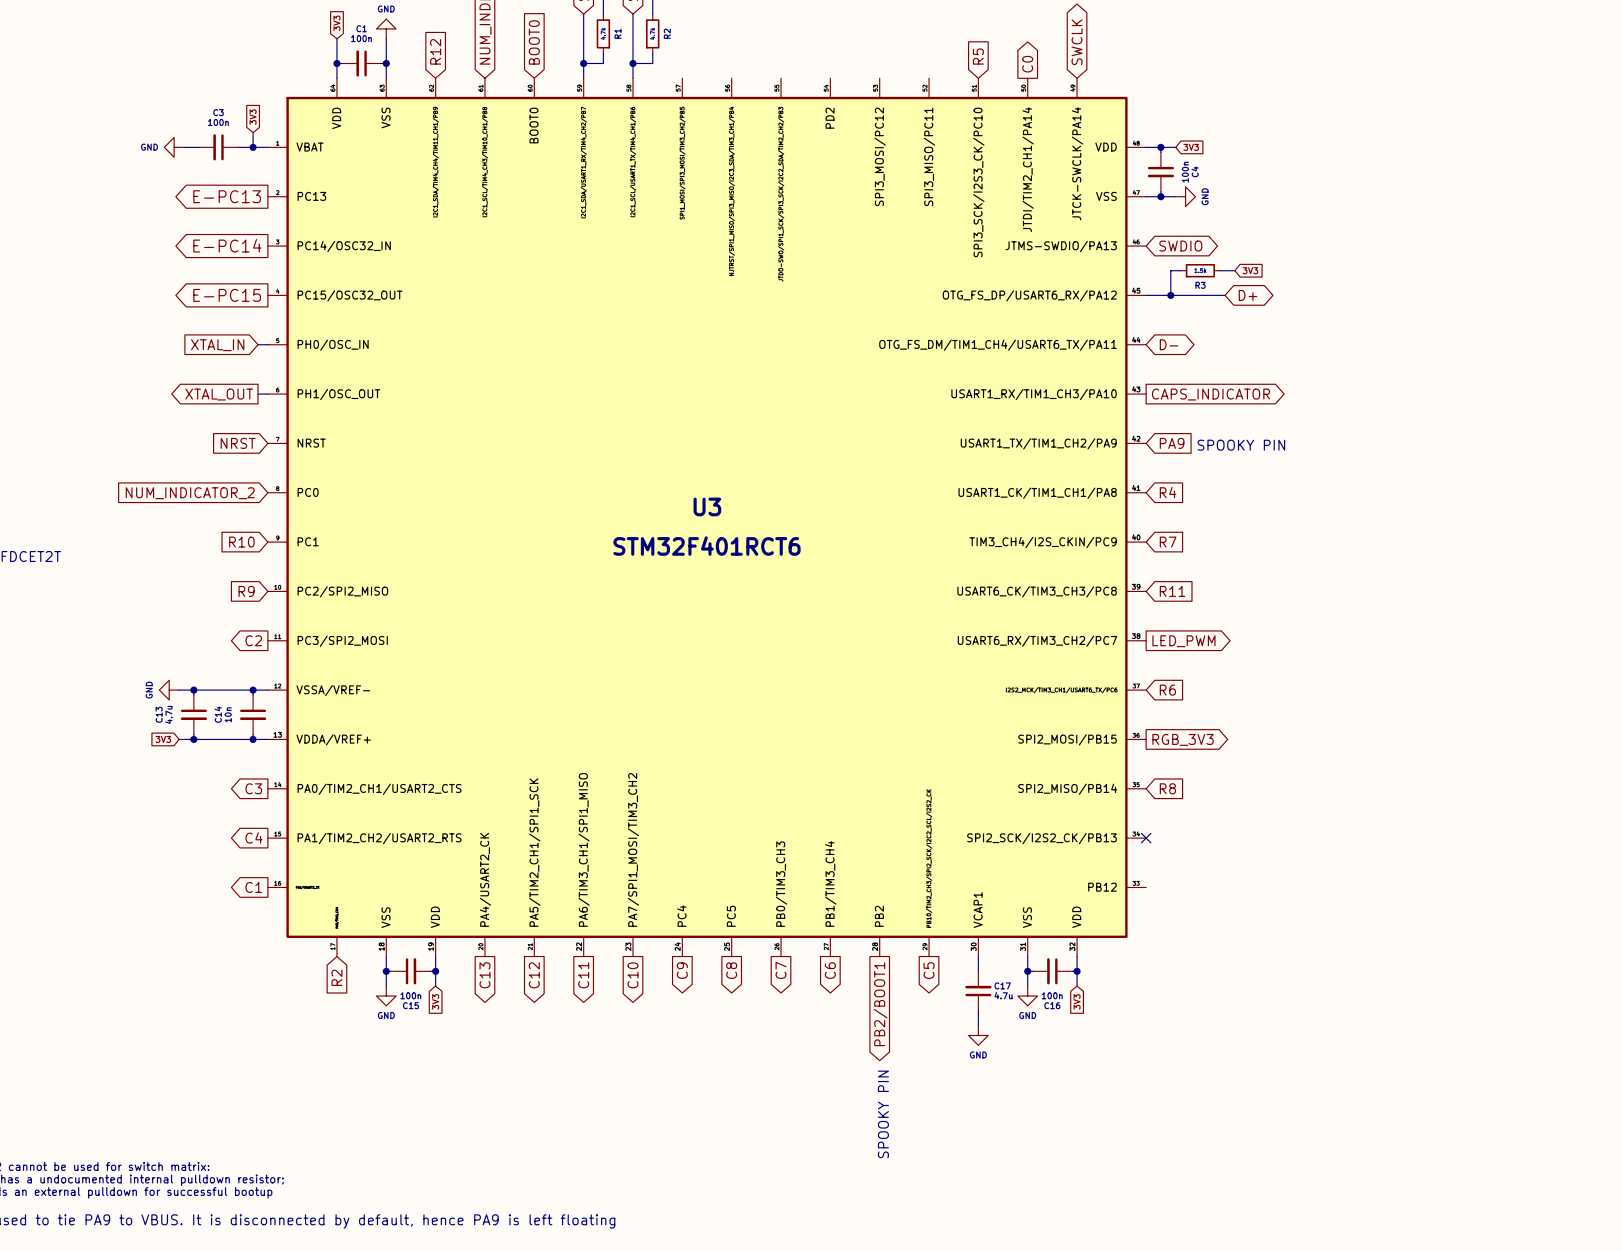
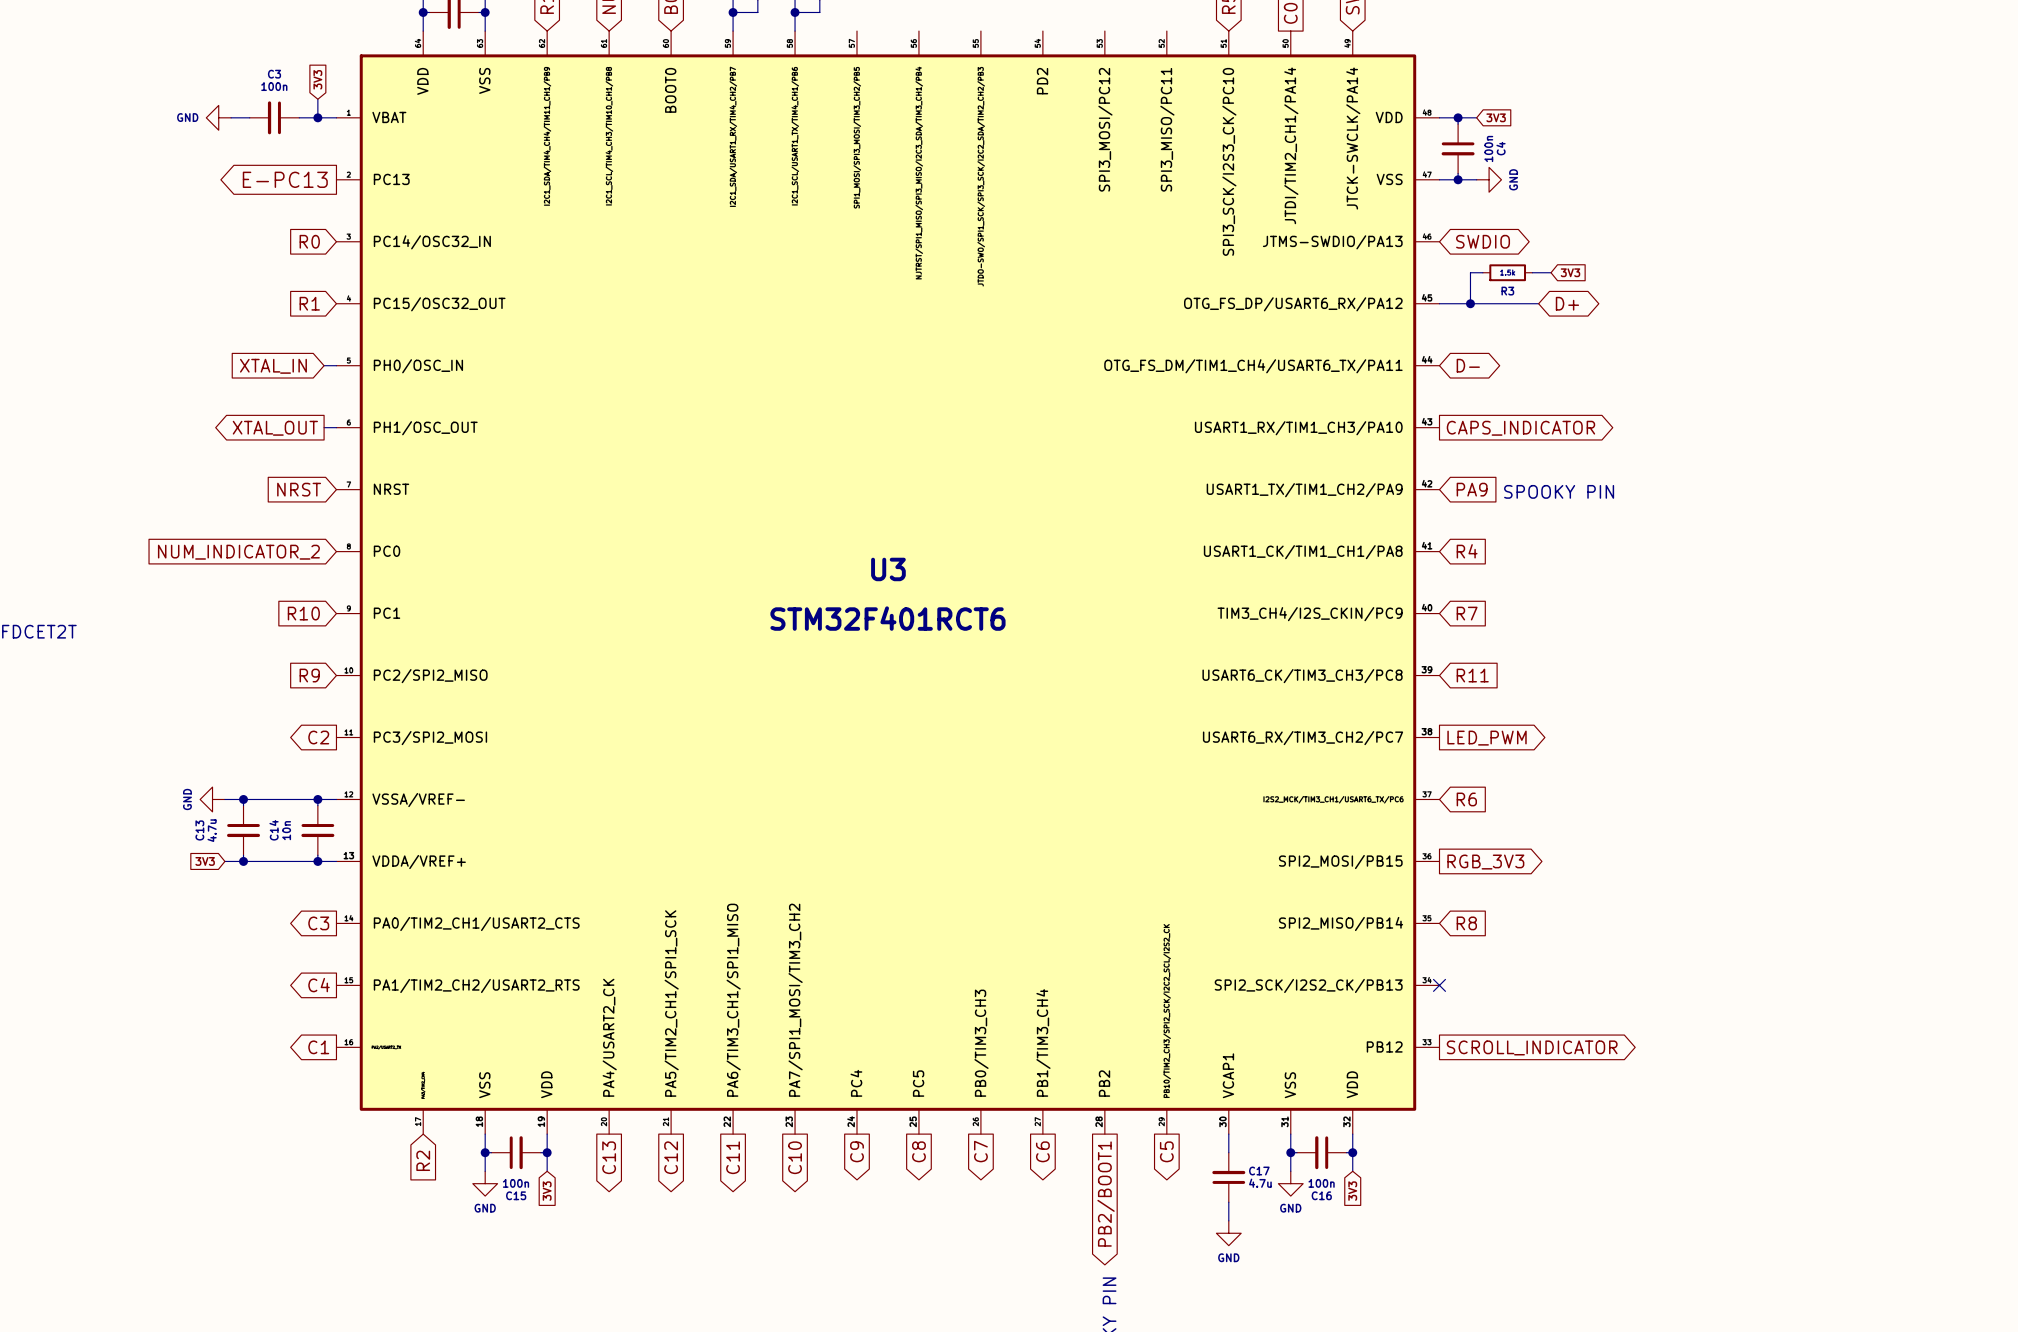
global label shape: output (227, 245) -> input (309, 241)
global label: E-PC14 (227, 245) -> R0 (309, 241)
global label shape: output (227, 295) -> input (309, 303)
global label: E-PC15 (227, 295) -> R1 (309, 303)
global label: none -> SCROLL_INDICATOR (1532, 1047)

